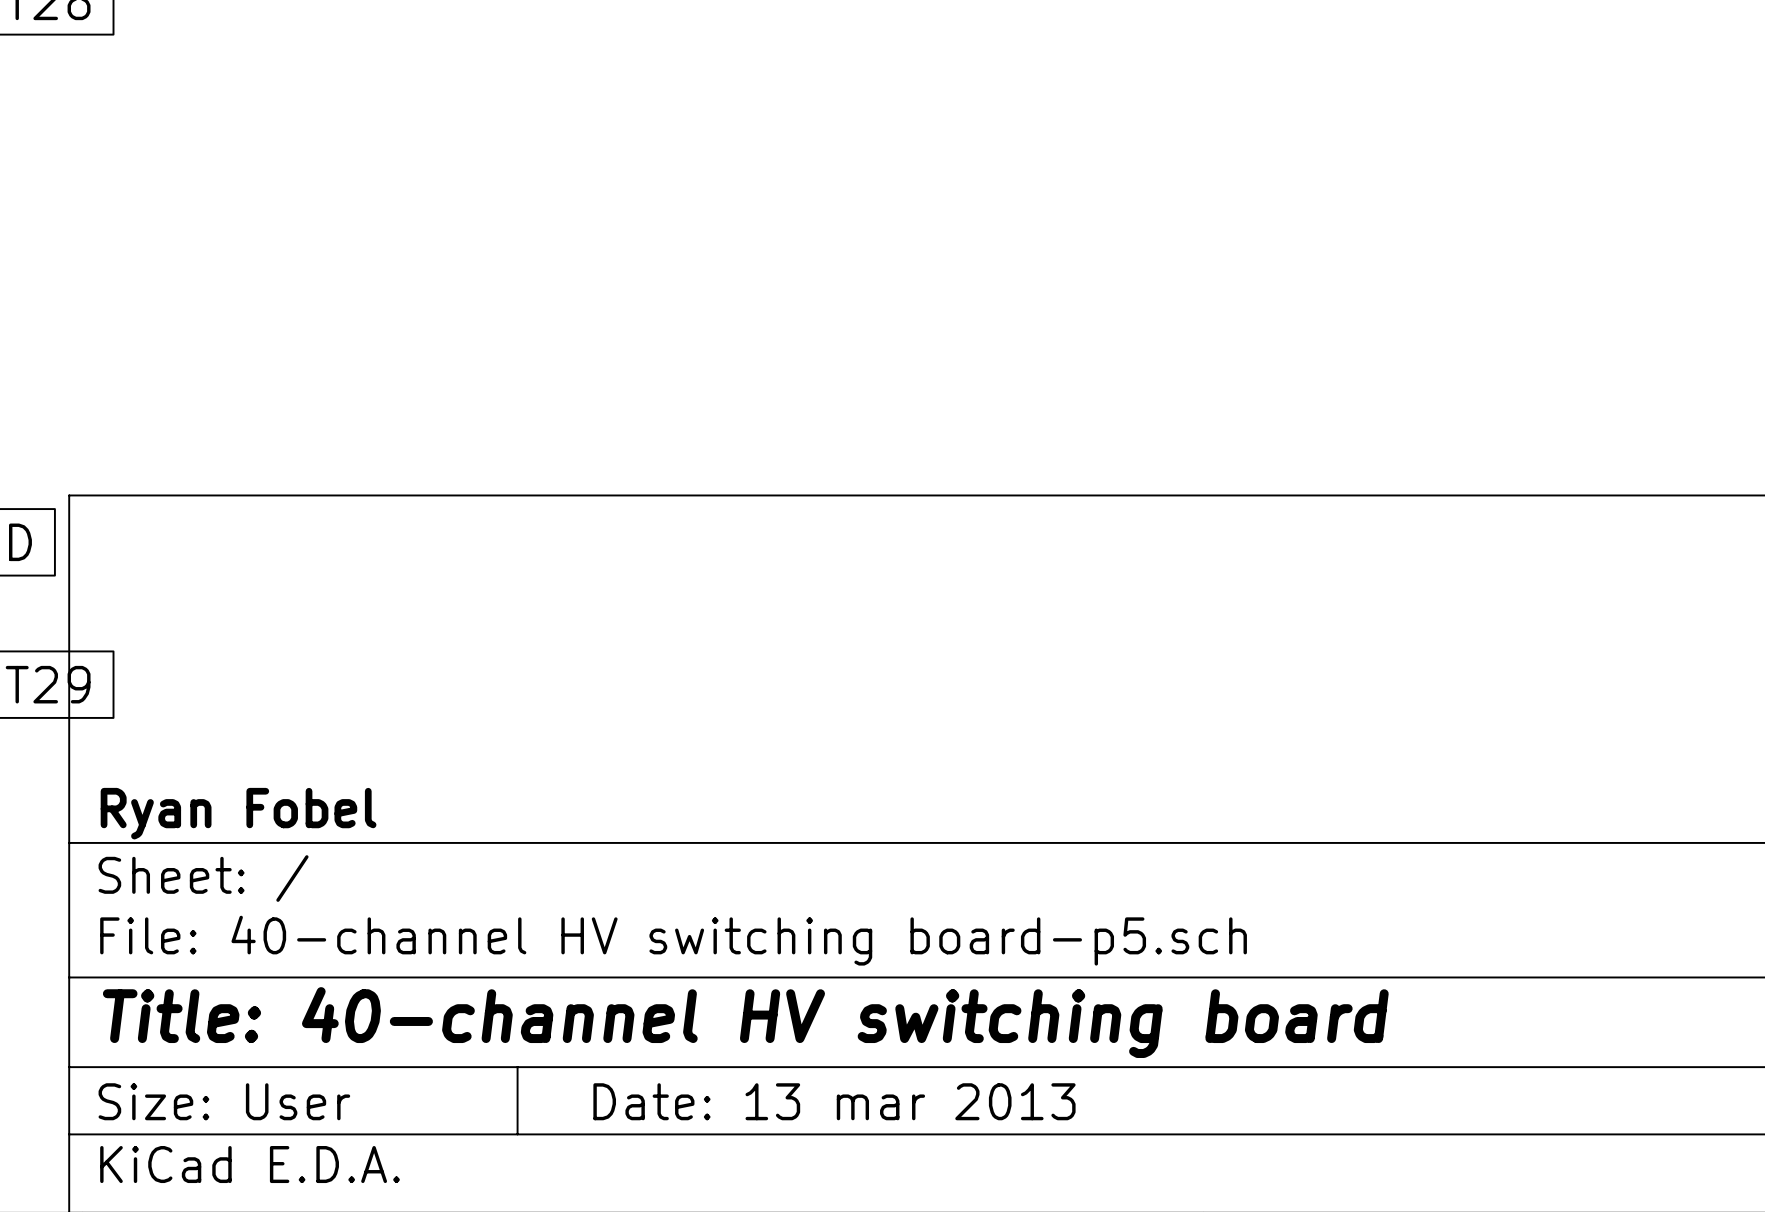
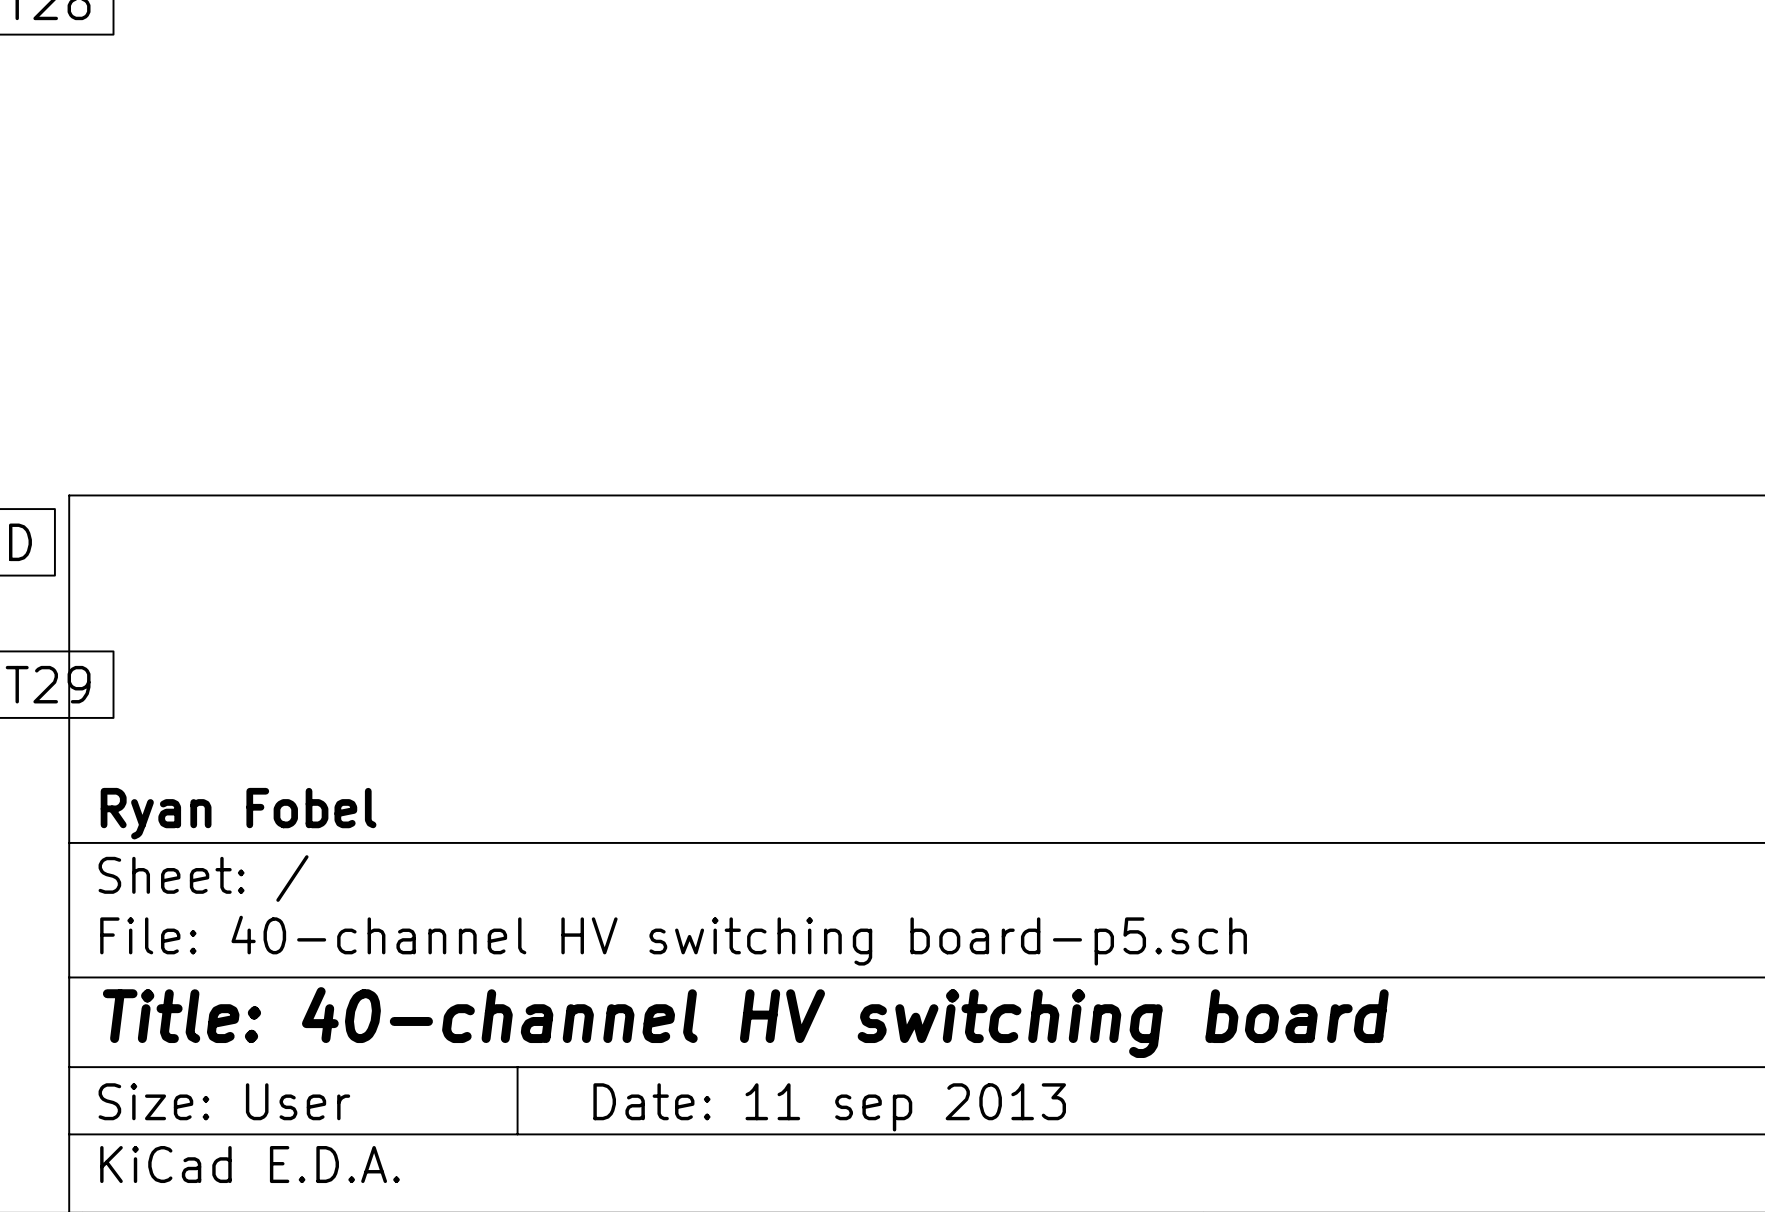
title block: Date: 13 mar 2013 (834, 1101) -> Date: 11 sep 2013 (829, 1107)

